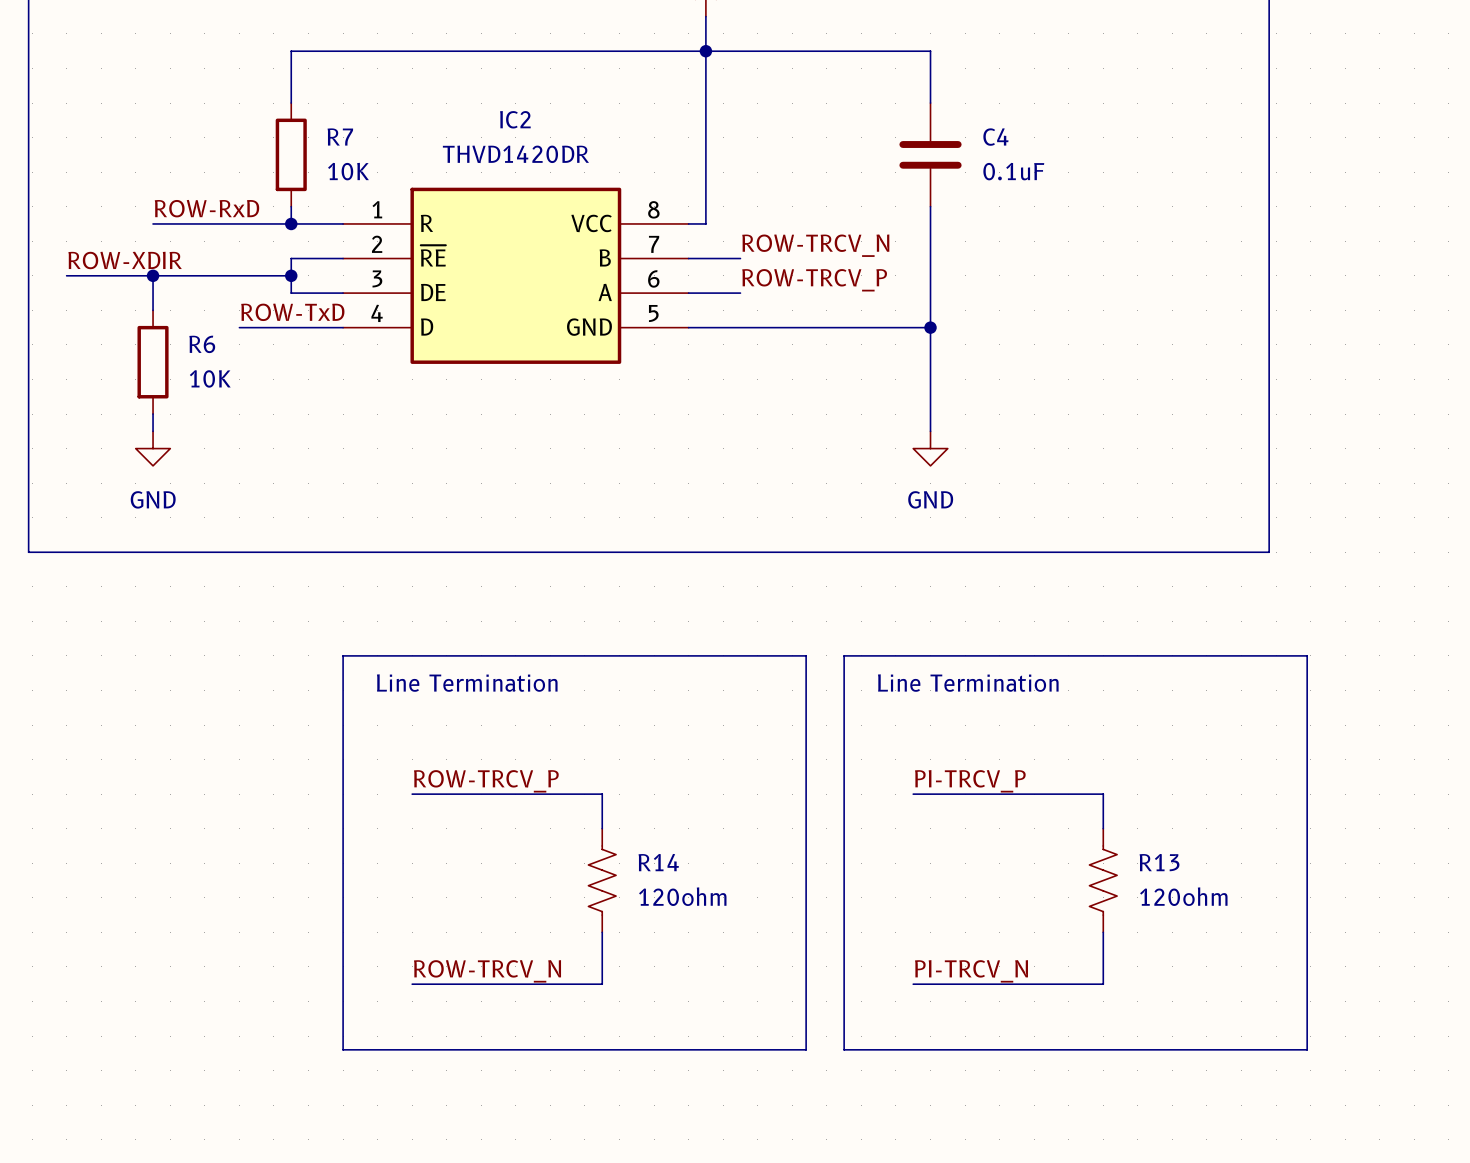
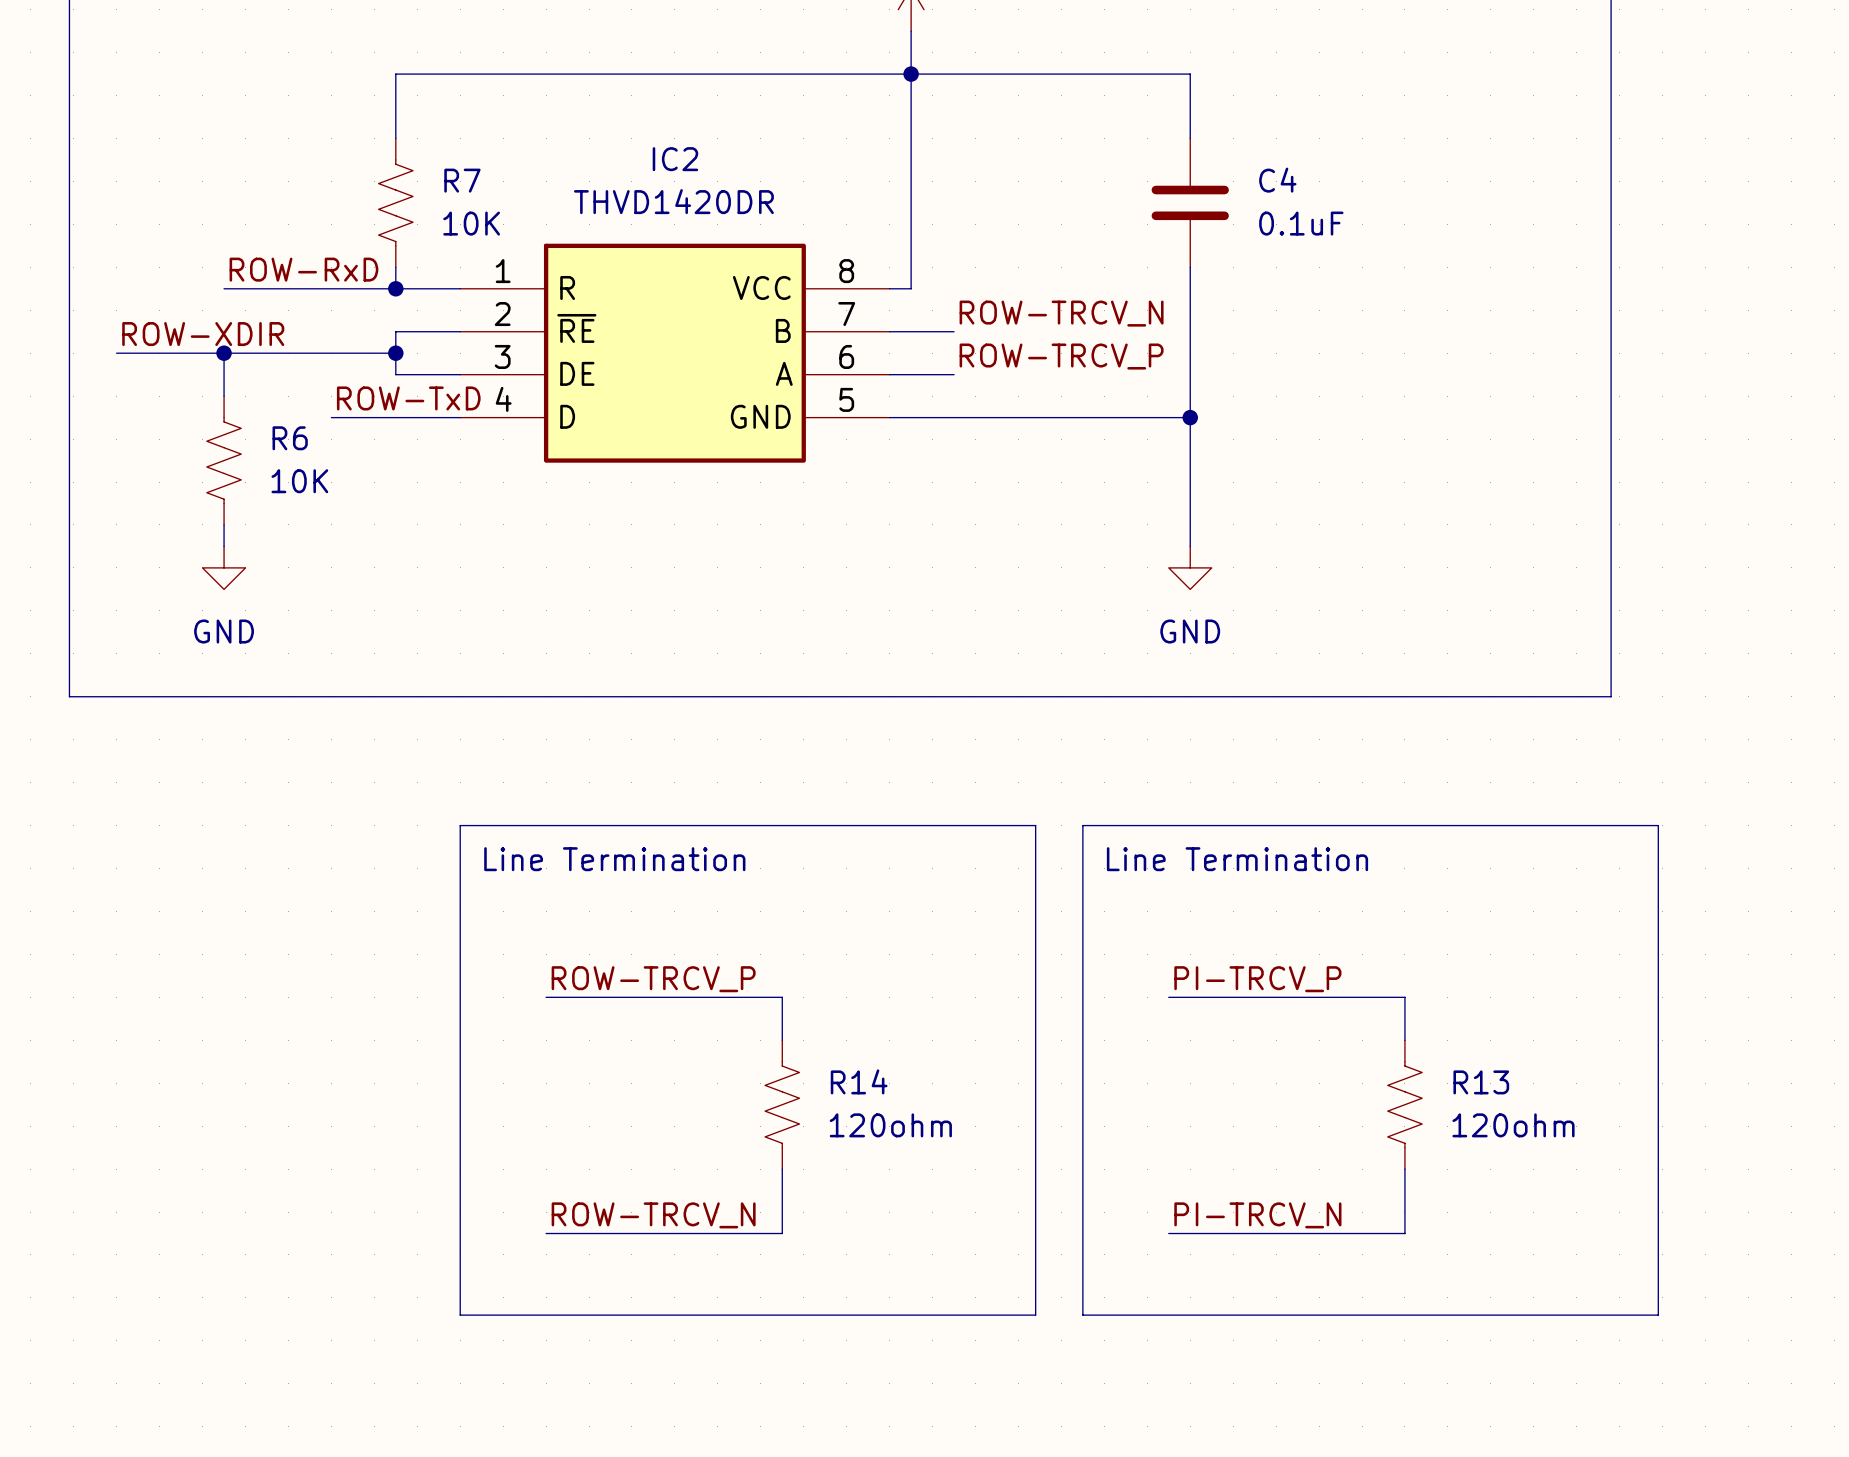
R7 symbol: [275, 103, 307, 207] -> [378, 138, 413, 268]
R6 symbol: [137, 310, 169, 415] -> [206, 396, 242, 525]

